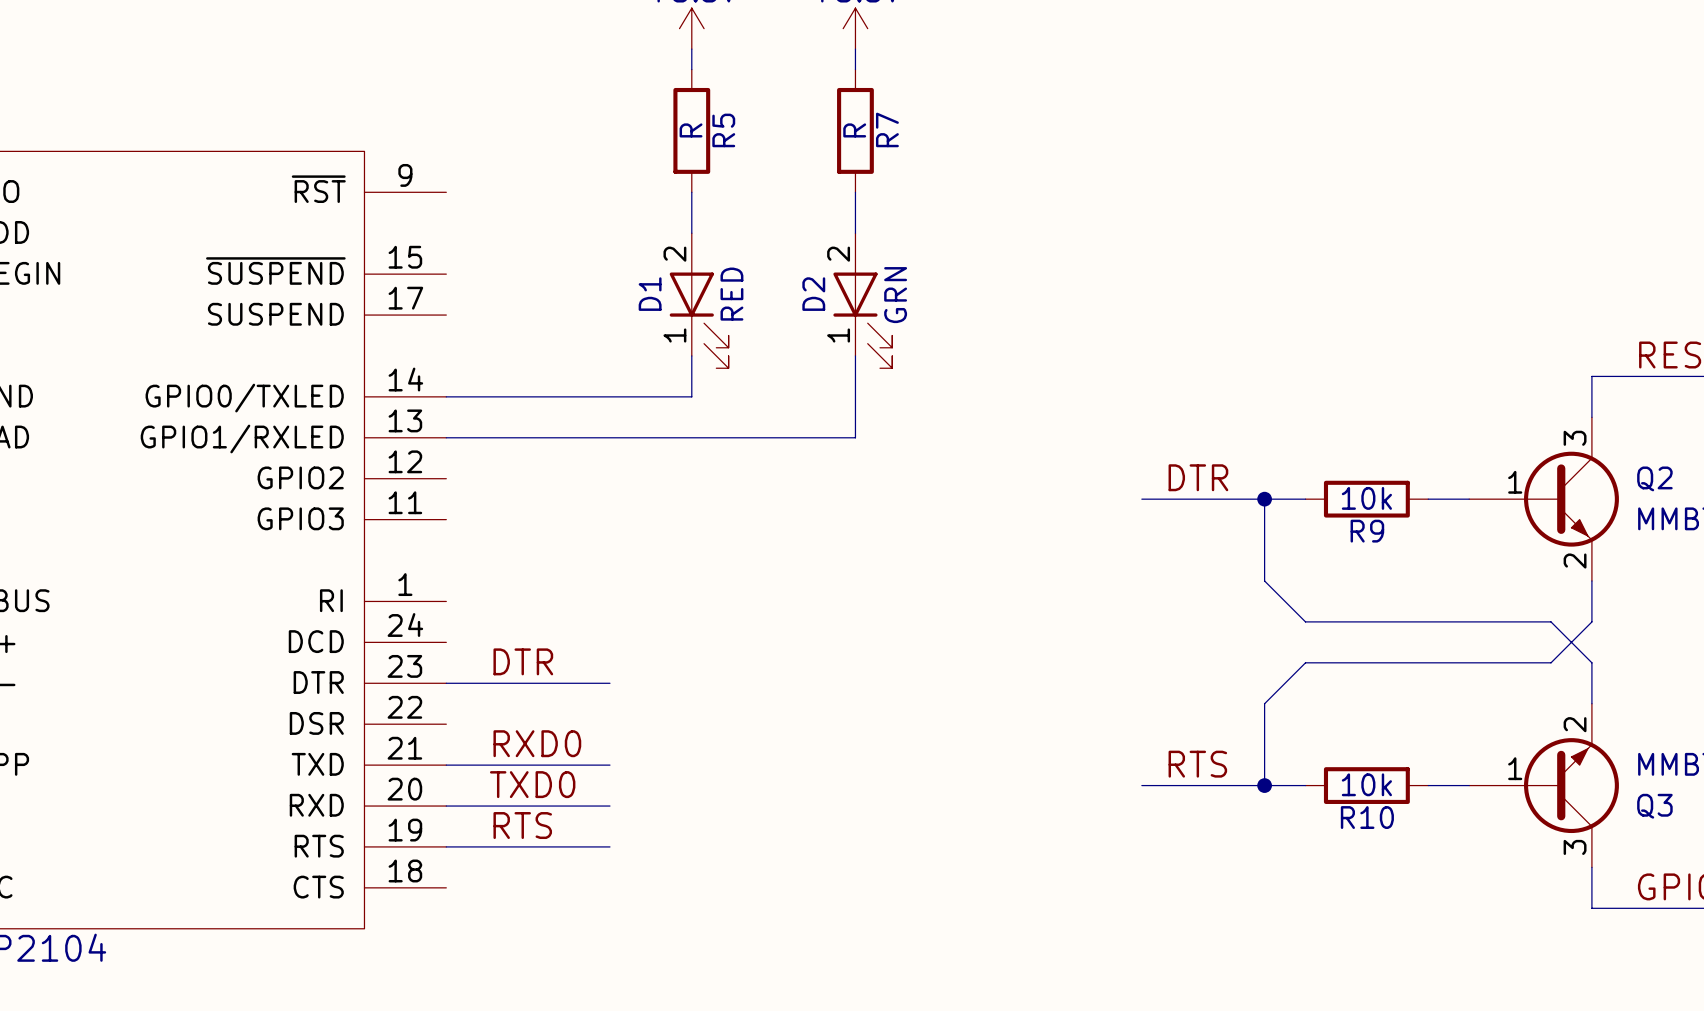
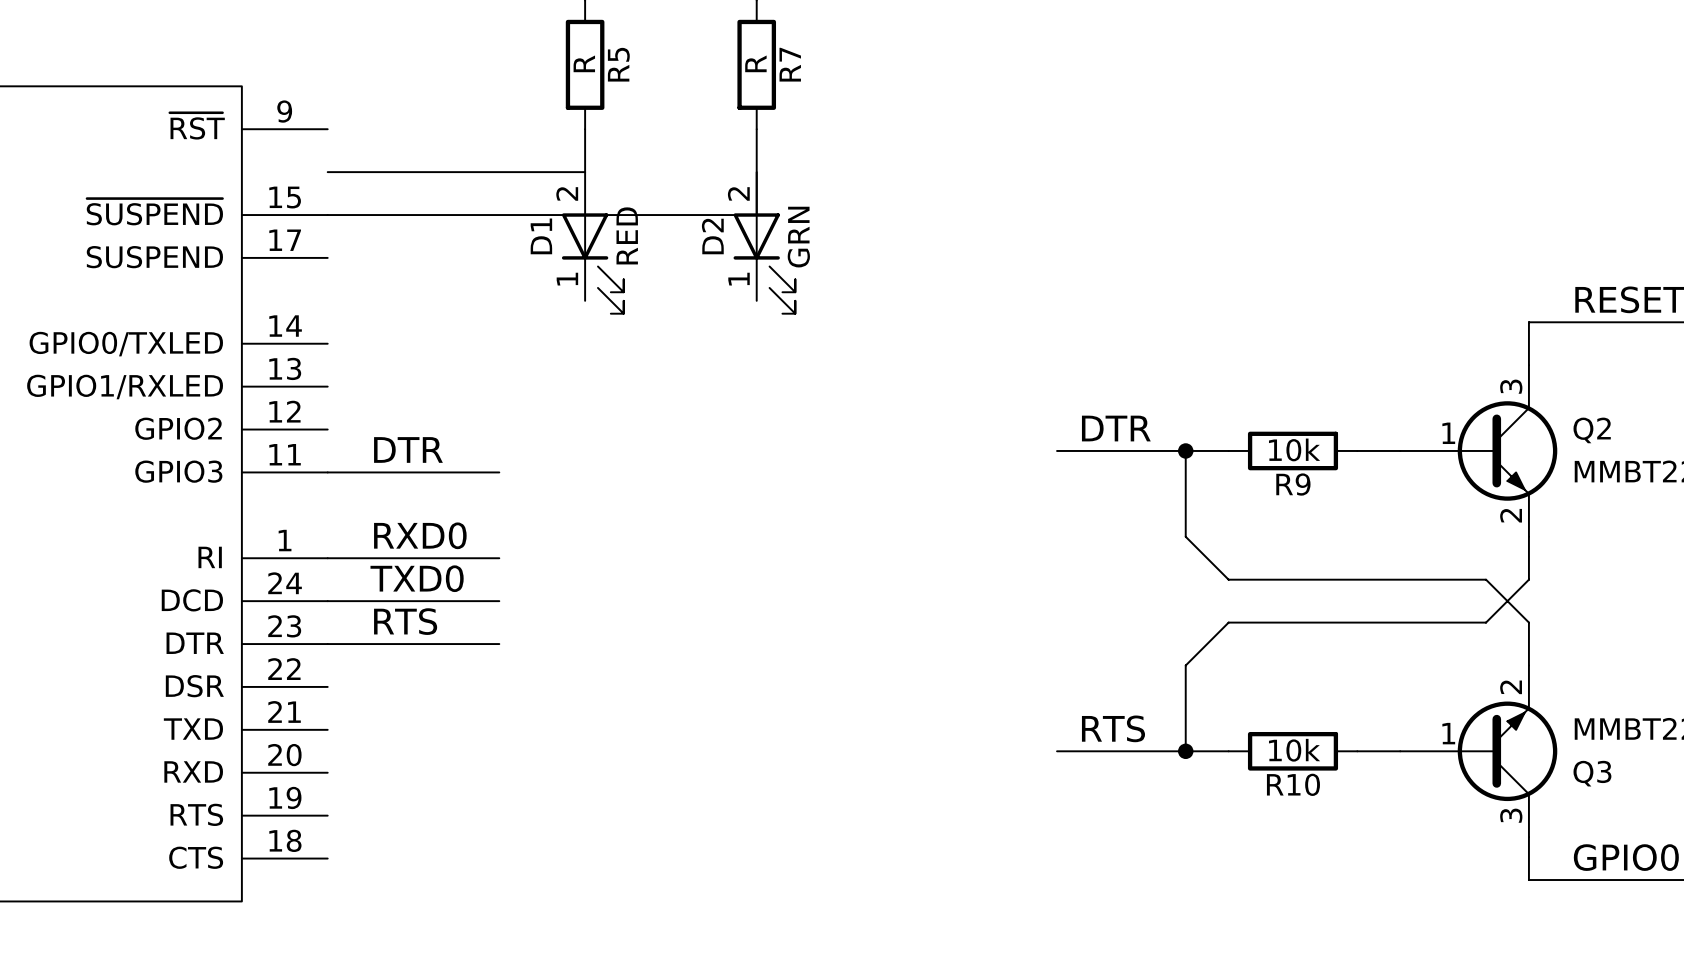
wire: none -> (327, 172) (585, 172)
wire: none -> (756, 172) (756, 215) (327, 215)
wire: (691, 355) (691, 396) (446, 396) -> none
wire: (855, 355) (855, 437) (446, 437) -> none
label: none -> DTR (408, 449)
label: DTR (523, 661) -> RTS (405, 621)
label position: RXD0 (537, 743) -> RXD0 (420, 535)
wire: (446, 765) (609, 765) -> (327, 558) (499, 558)
label position: TXD0 (532, 784) -> TXD0 (417, 578)
wire: (446, 806) (609, 806) -> (327, 601) (499, 601)
label: RTS (522, 825) -> none
wire: (446, 846) (609, 846) -> (327, 472) (499, 472)

